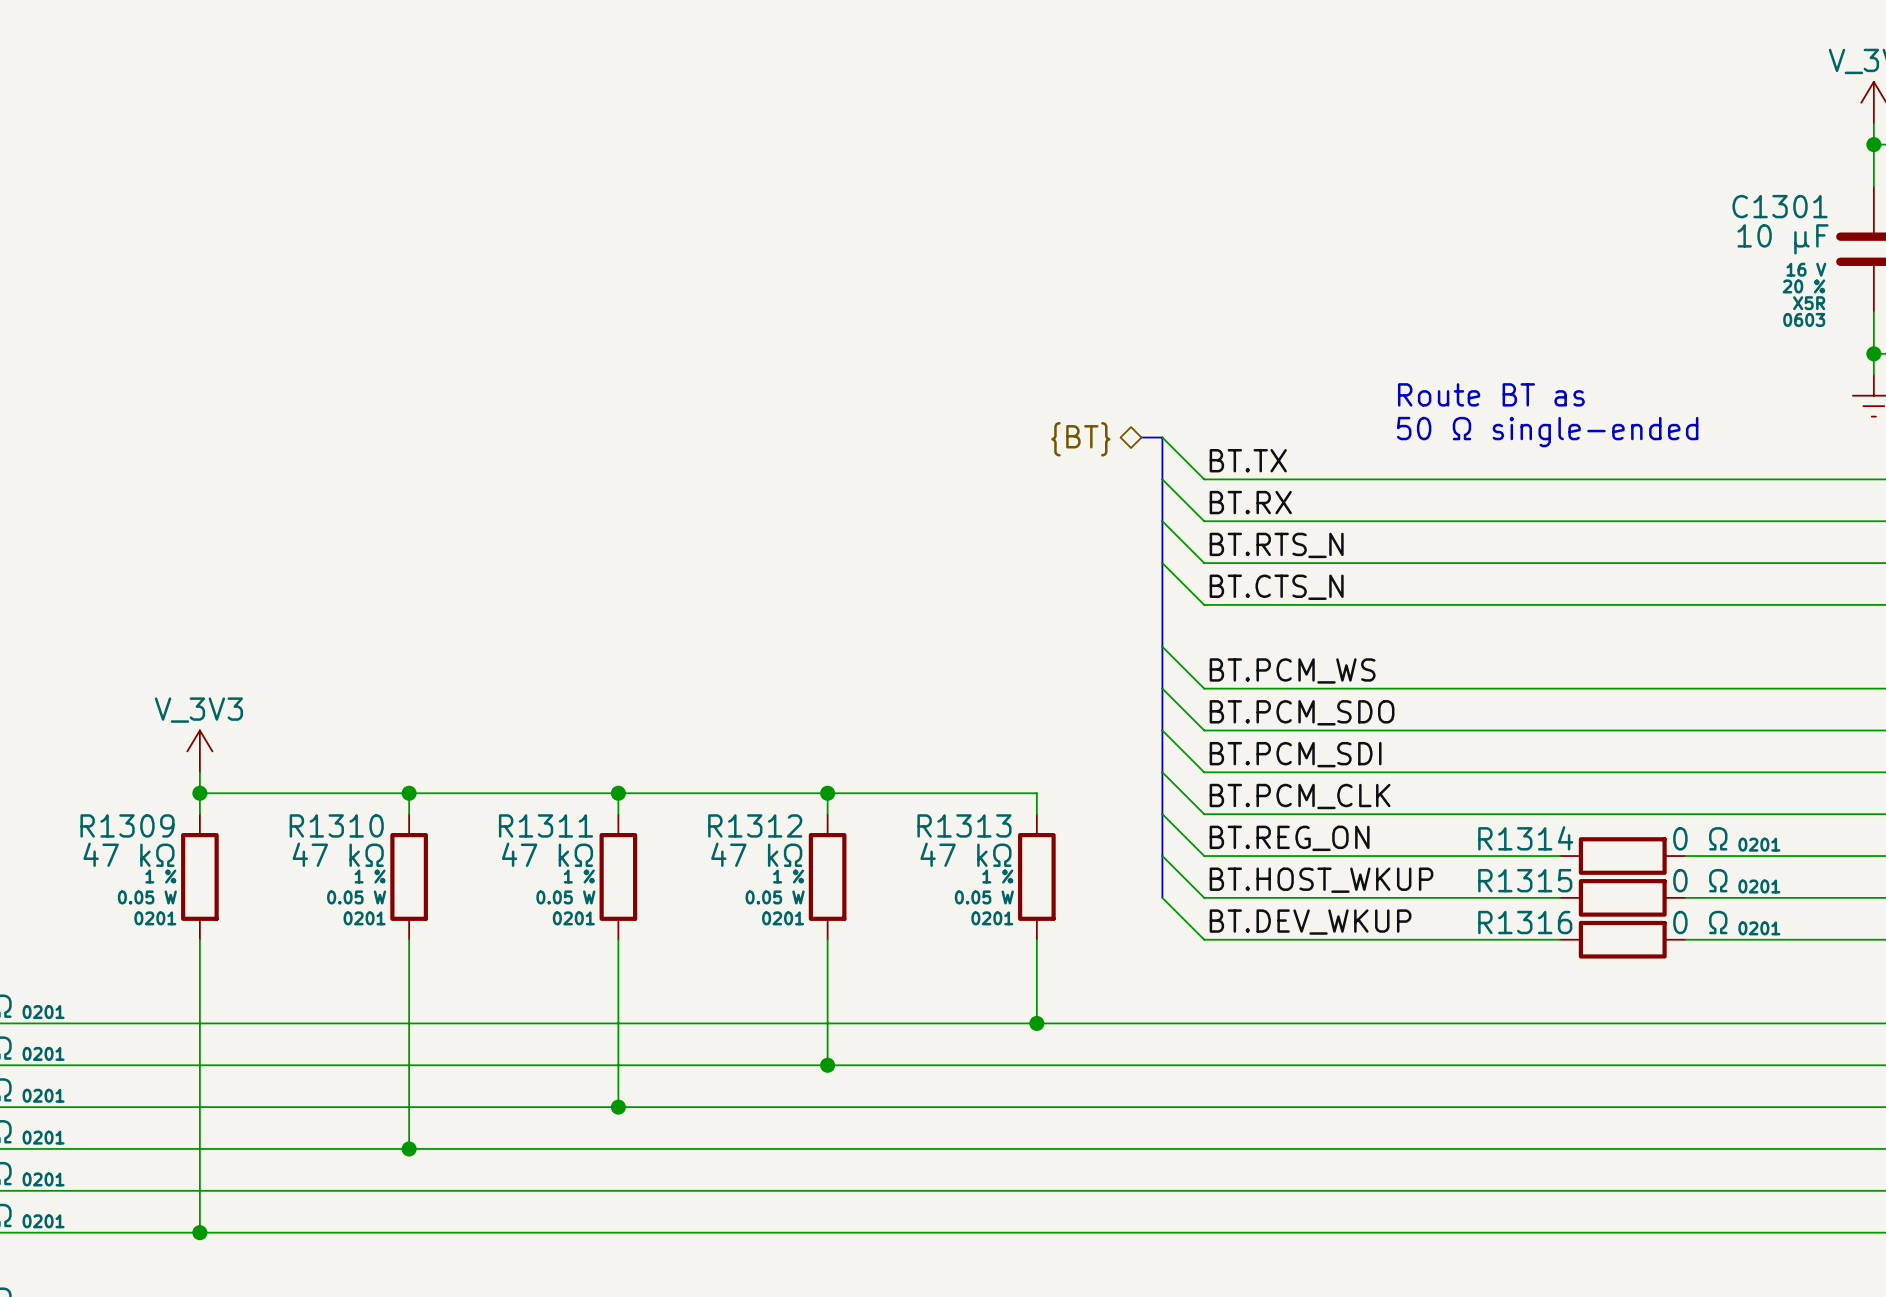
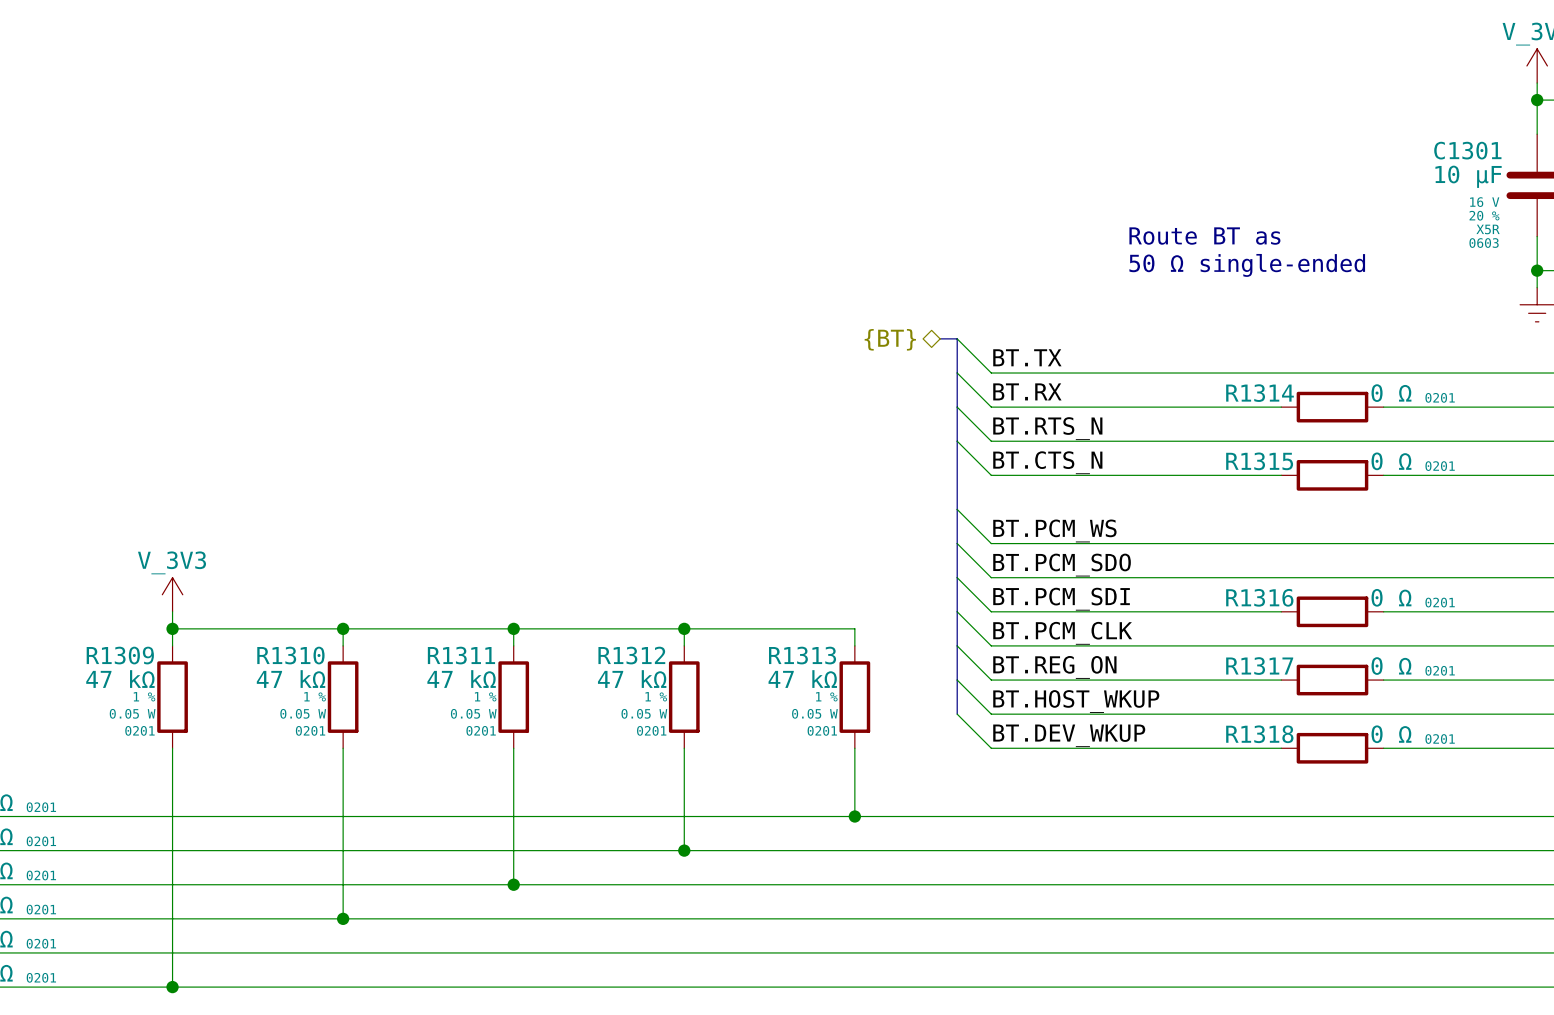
text position: Route BT as (1491, 394) -> Route BT as (1204, 236)
text position: 50 Ω single-ended (1547, 432) -> 50 Ω single-ended (1247, 265)
wire: (1559, 521) (1685, 521) -> none
R1314: none -> 0 Ω (1332, 407)
wire: (1559, 604) (1685, 604) -> none
wire: (1559, 772) (1685, 772) -> (1281, 714) (1383, 714)
R1316: none -> 0 Ω (1332, 611)
R1314 name: R1314 (1525, 838) -> R1317 (1259, 666)
R1315 position: (1622, 897) -> (1332, 475)
R1316 name: R1316 (1525, 922) -> R1318 (1259, 734)

